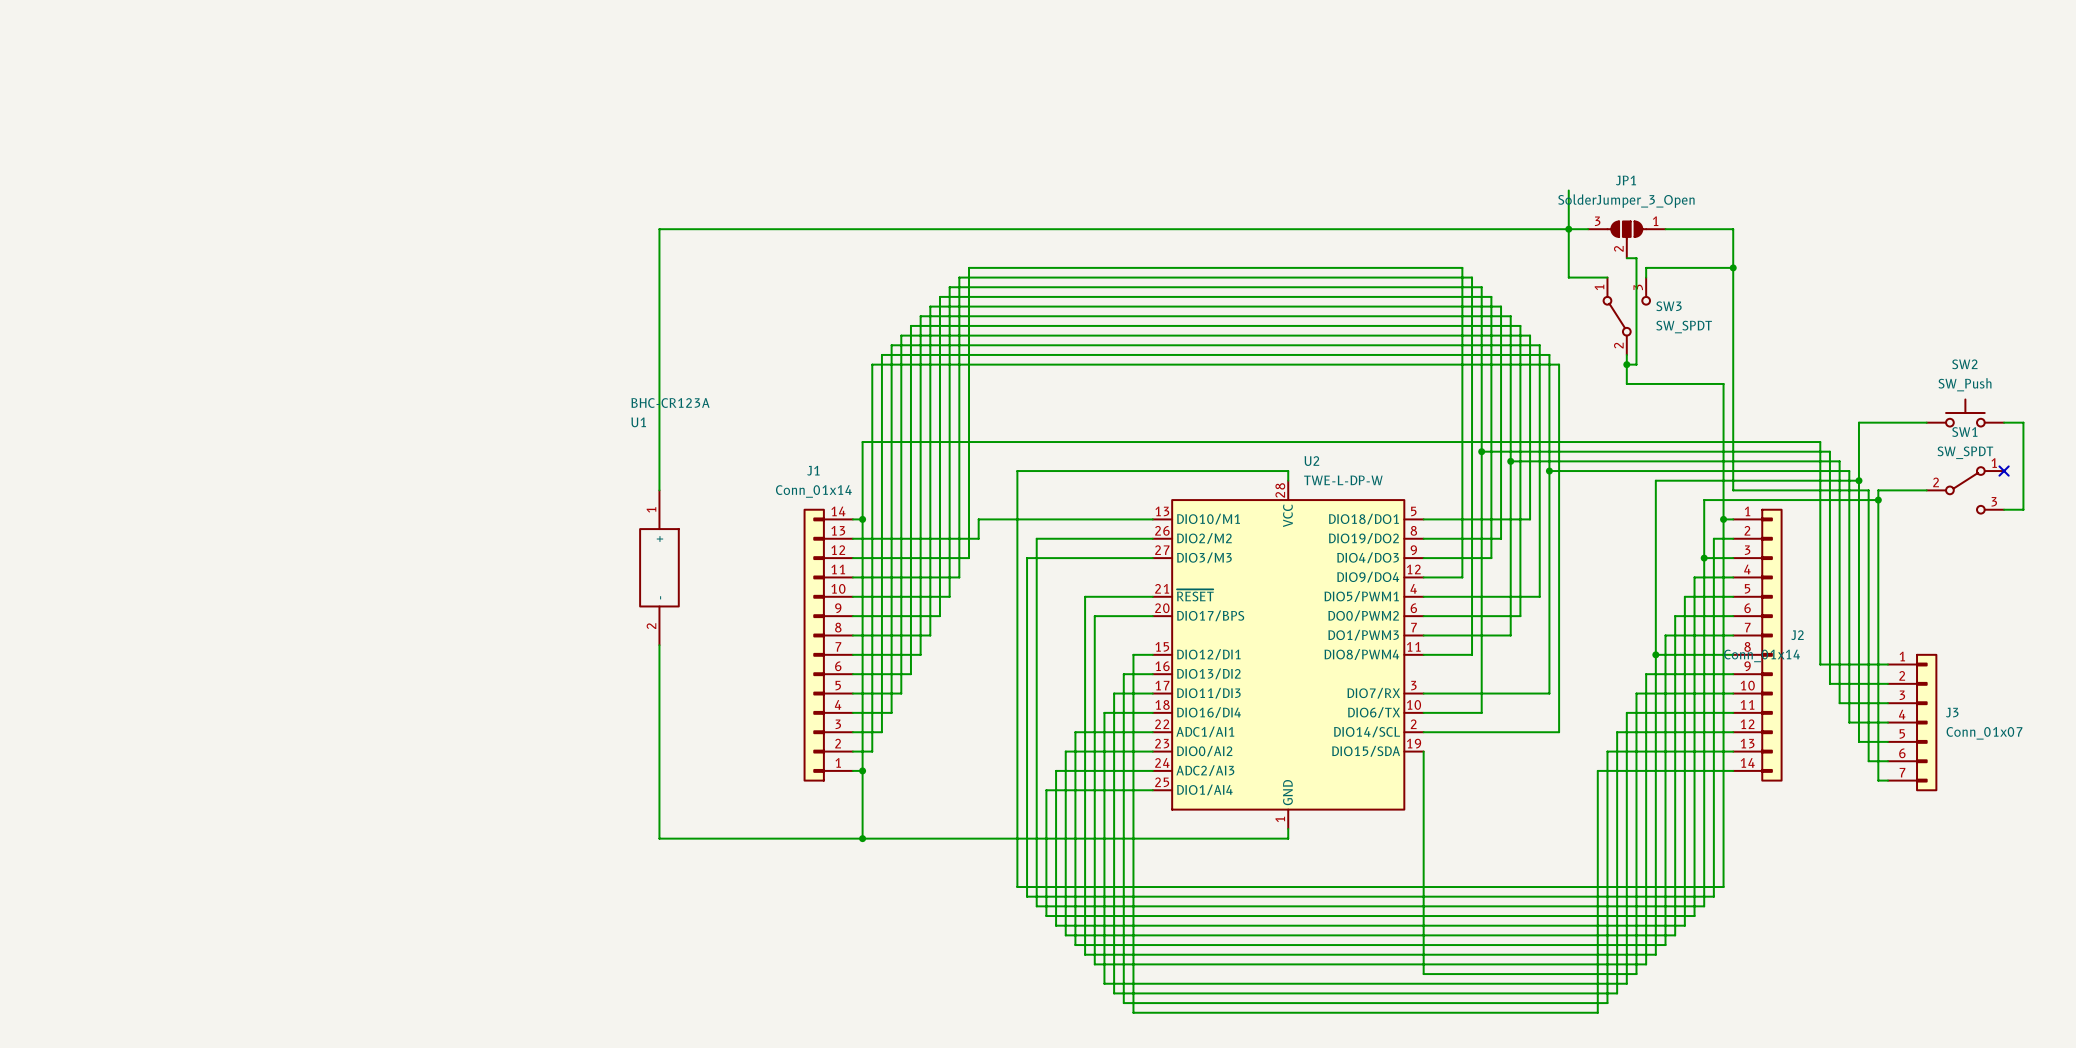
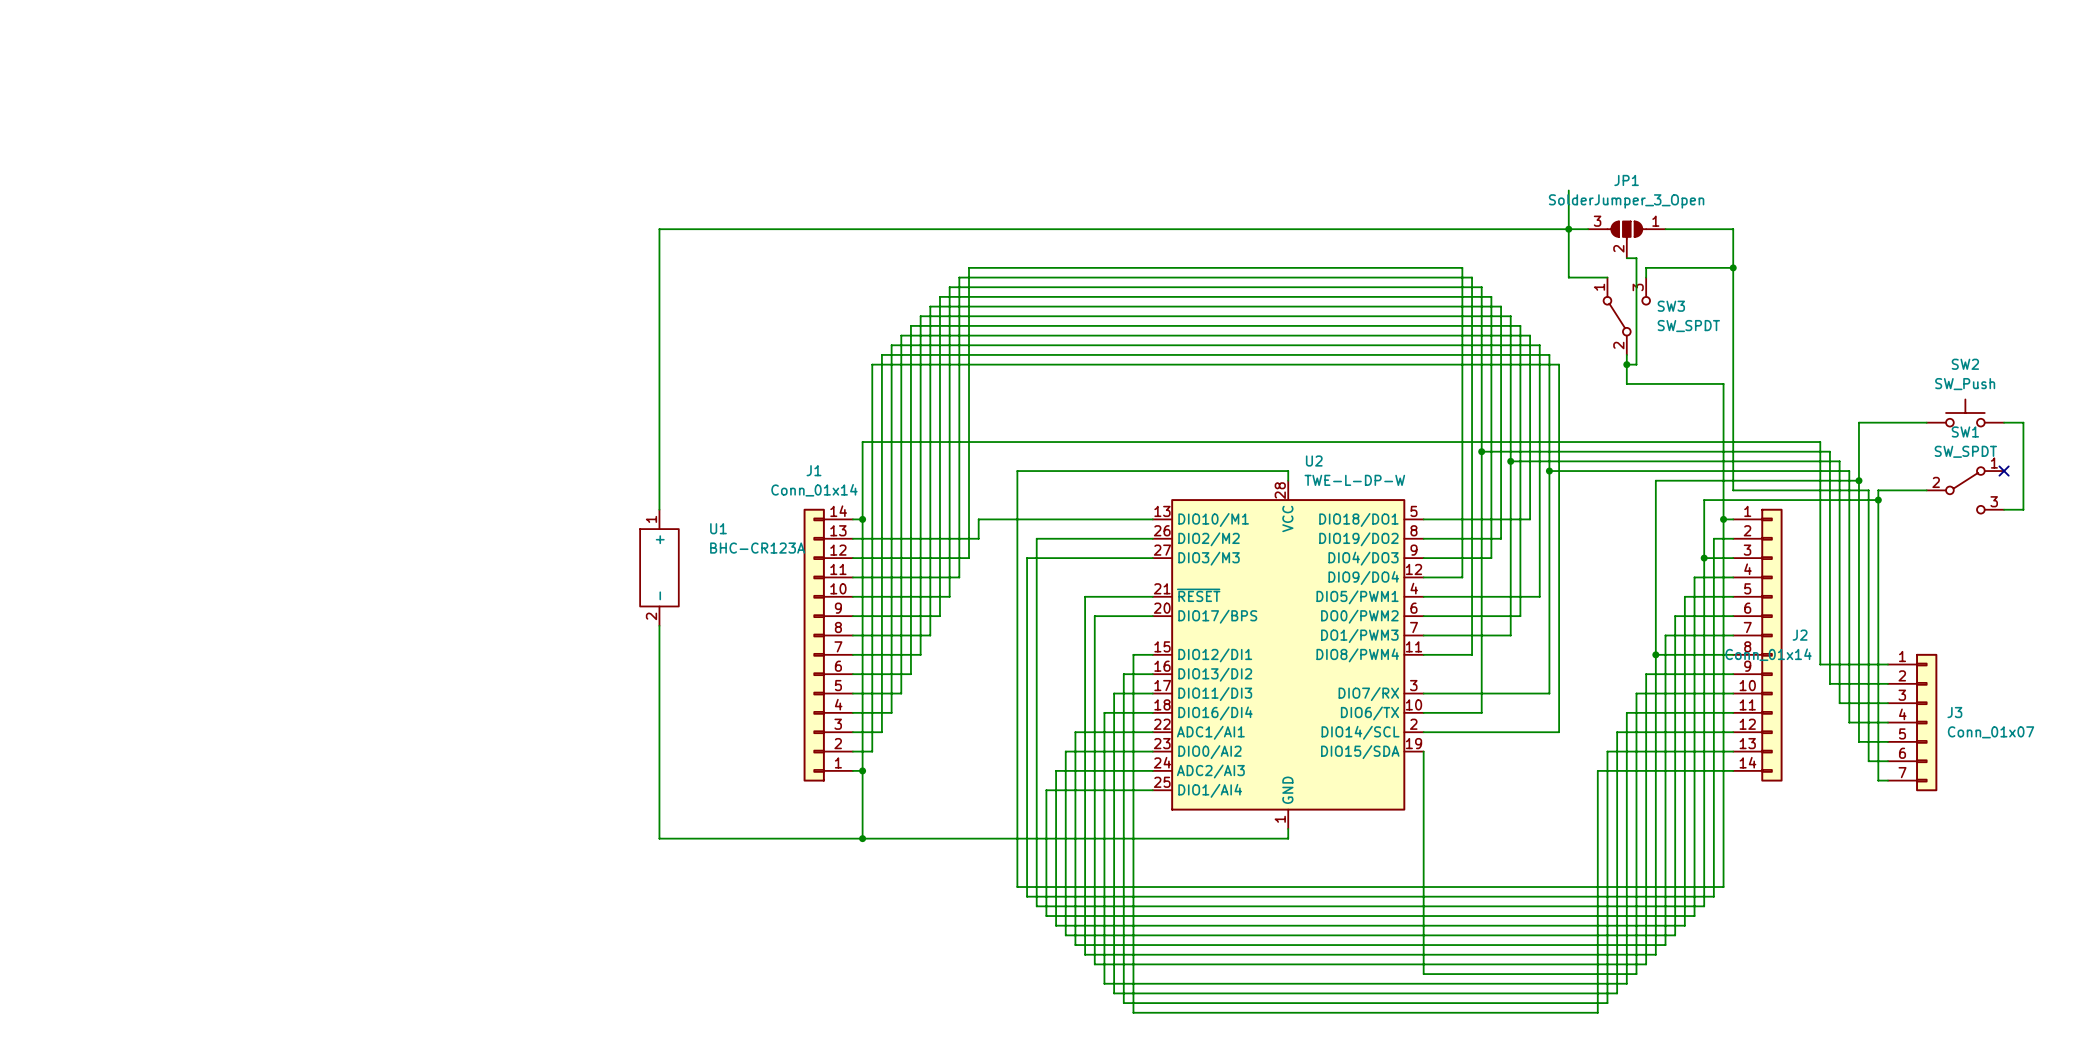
U1 value position: BHC-CR123A (670, 403) -> BHC-CR123A (757, 548)
U1 name position: U1 (638, 422) -> U1 (718, 528)
U1 symbol: [639, 490, 680, 646] -> [640, 509, 679, 626]

